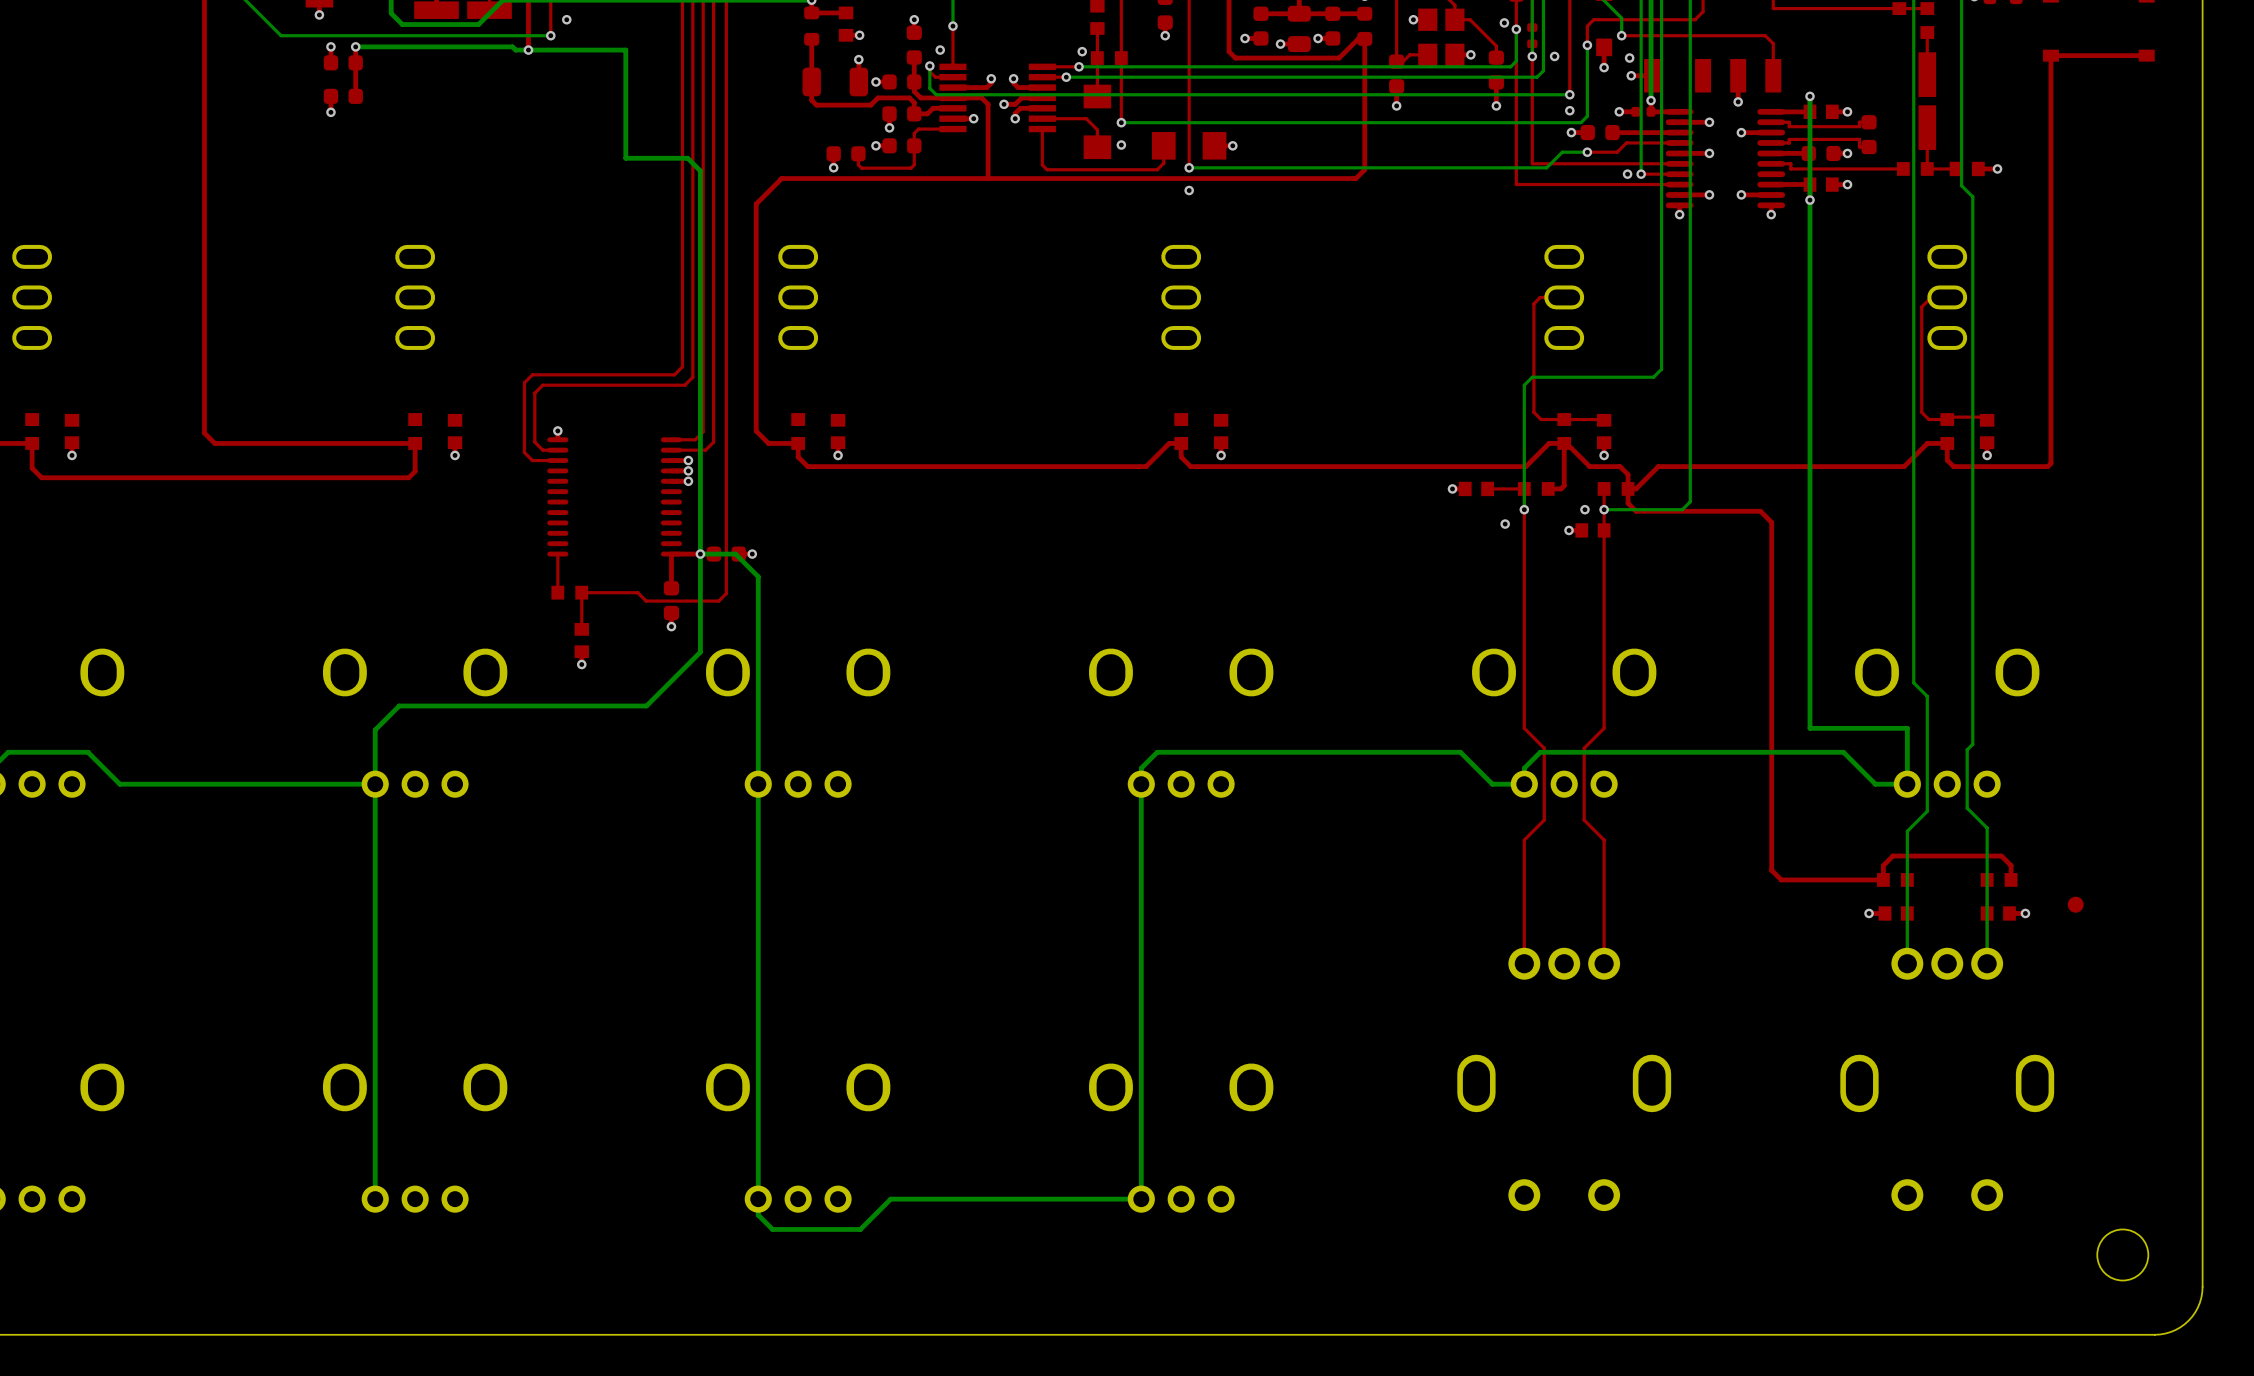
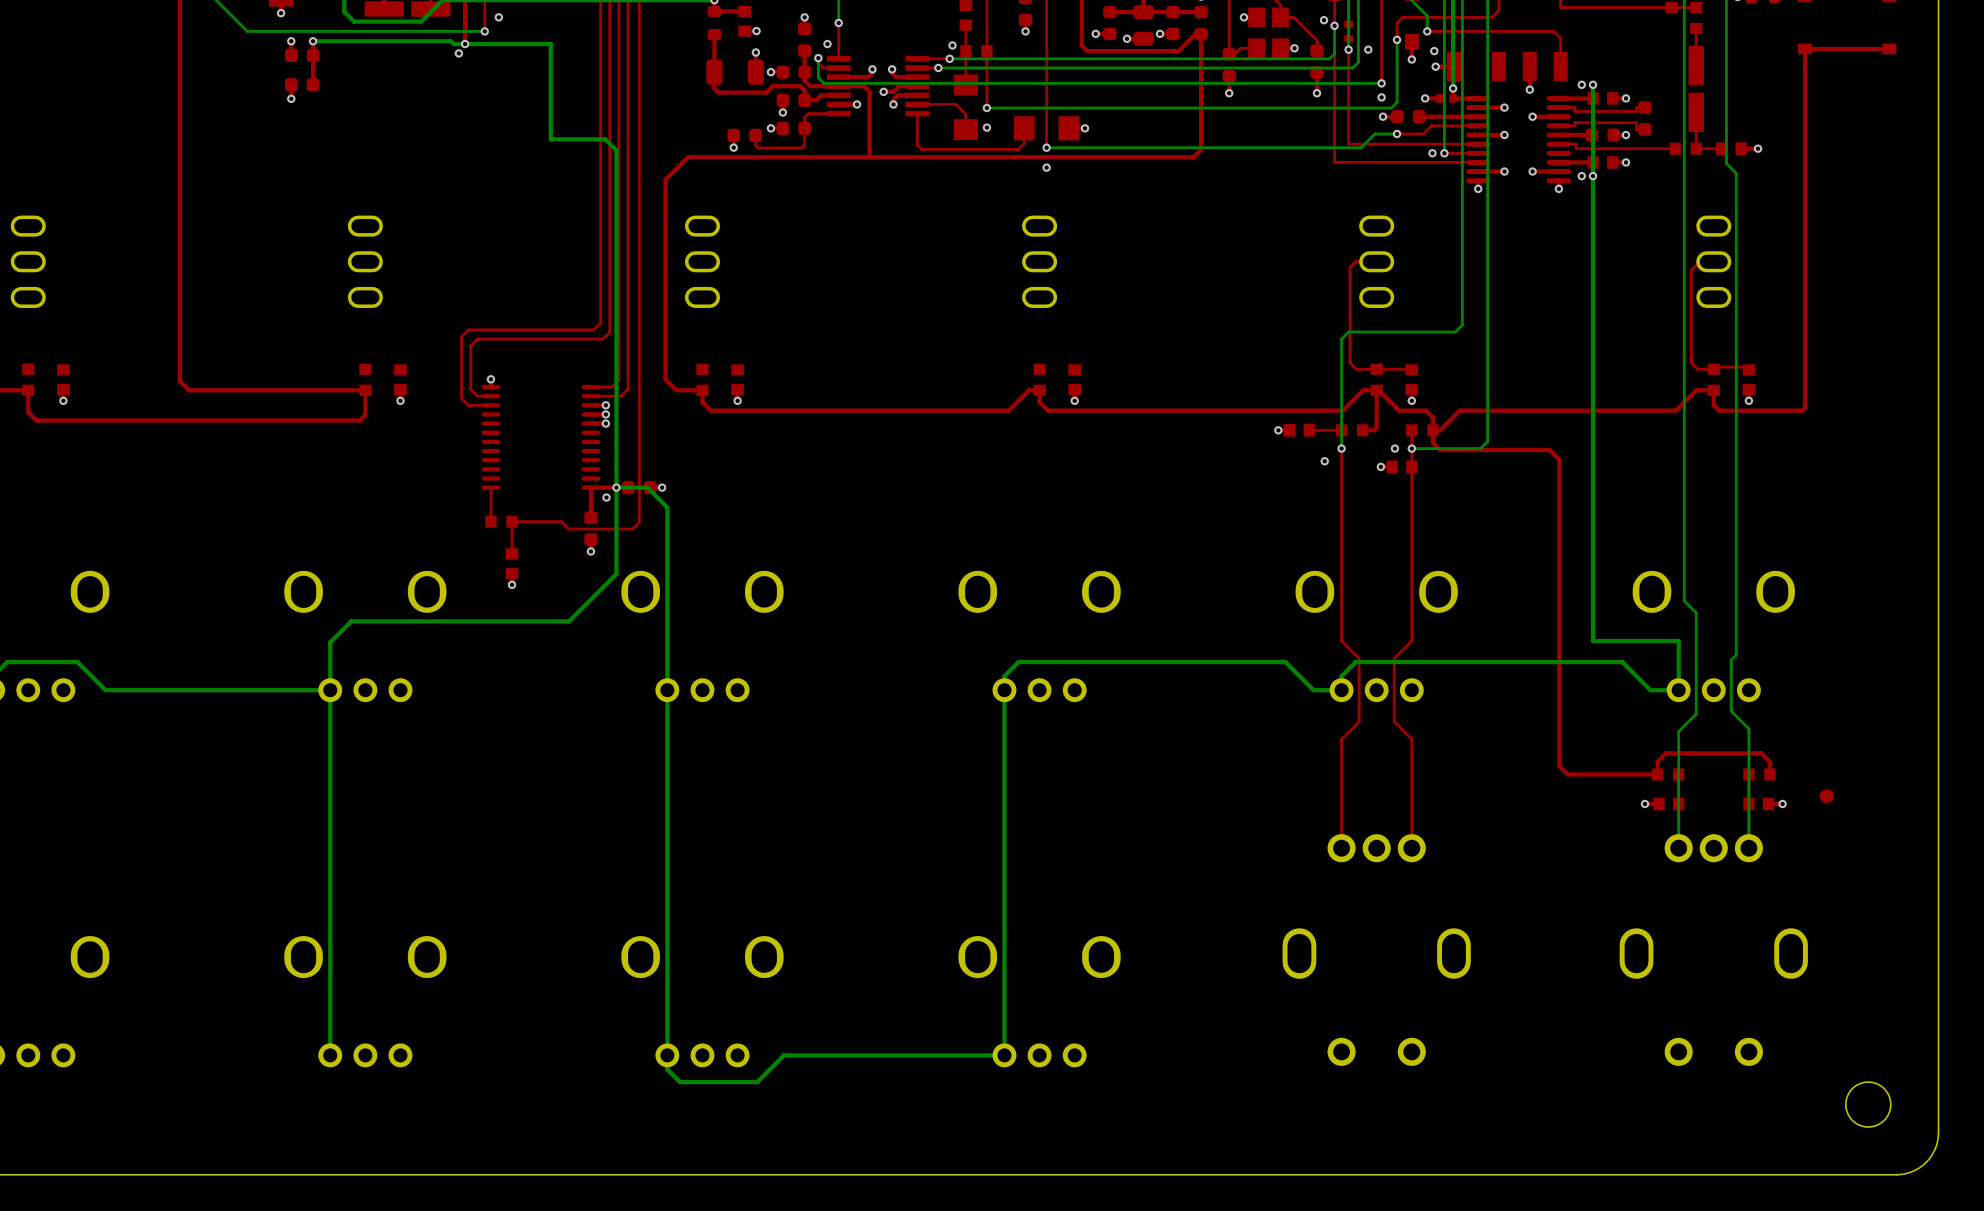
via: none -> (458, 53)
via: none -> (1581, 84)
via: none -> (1581, 176)
via: none -> (606, 497)

